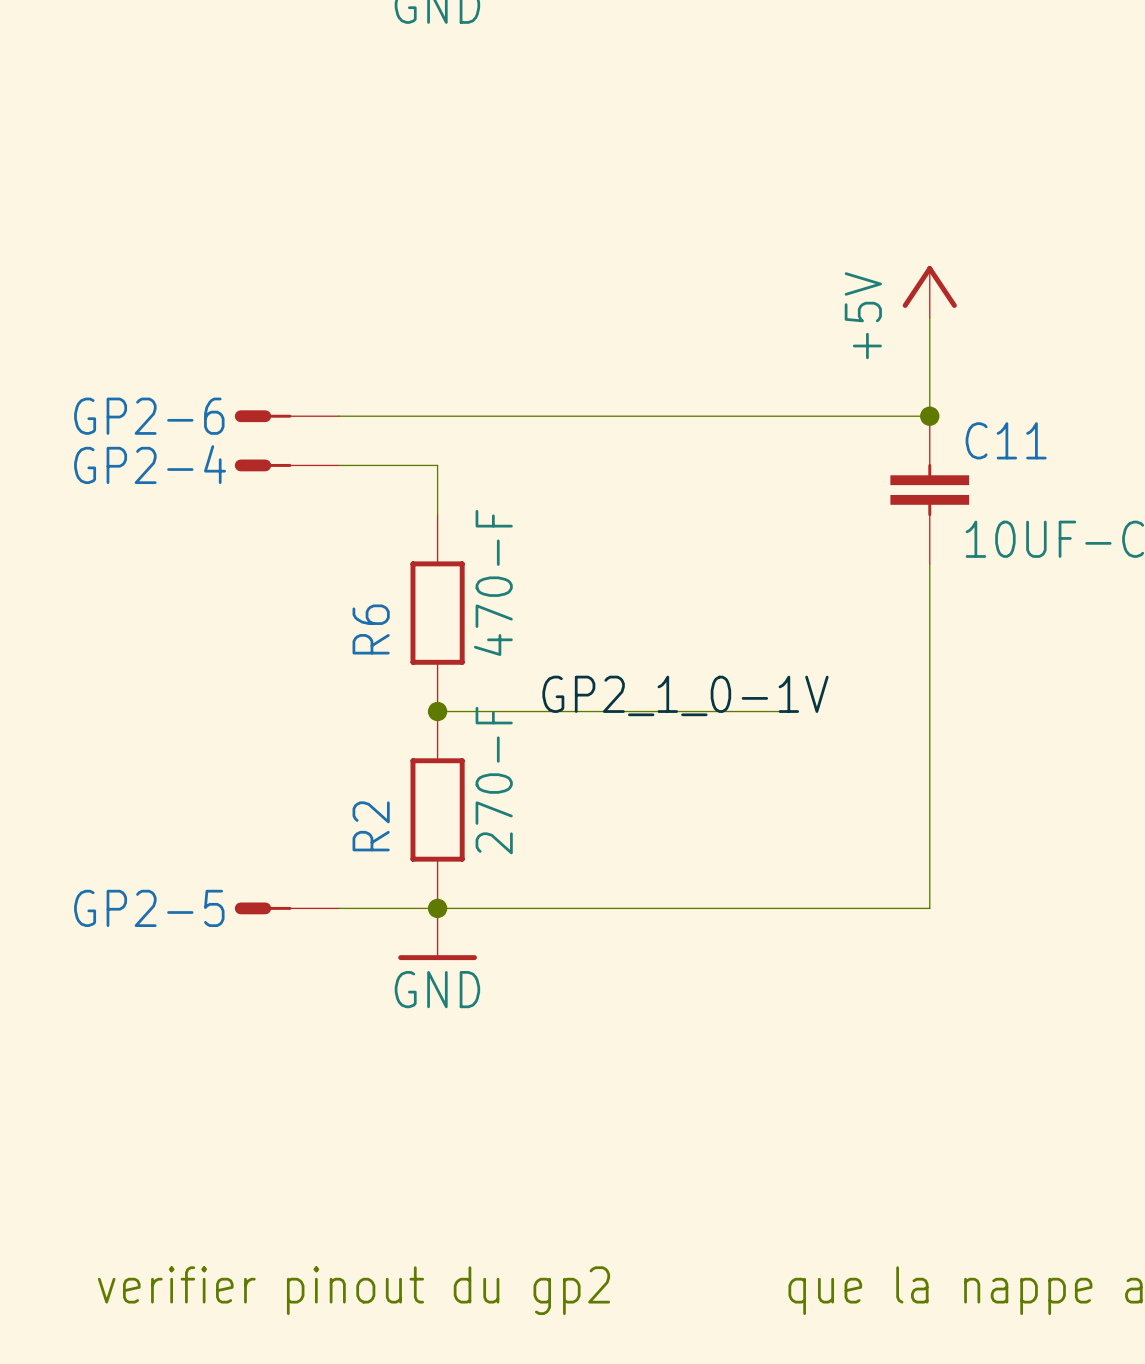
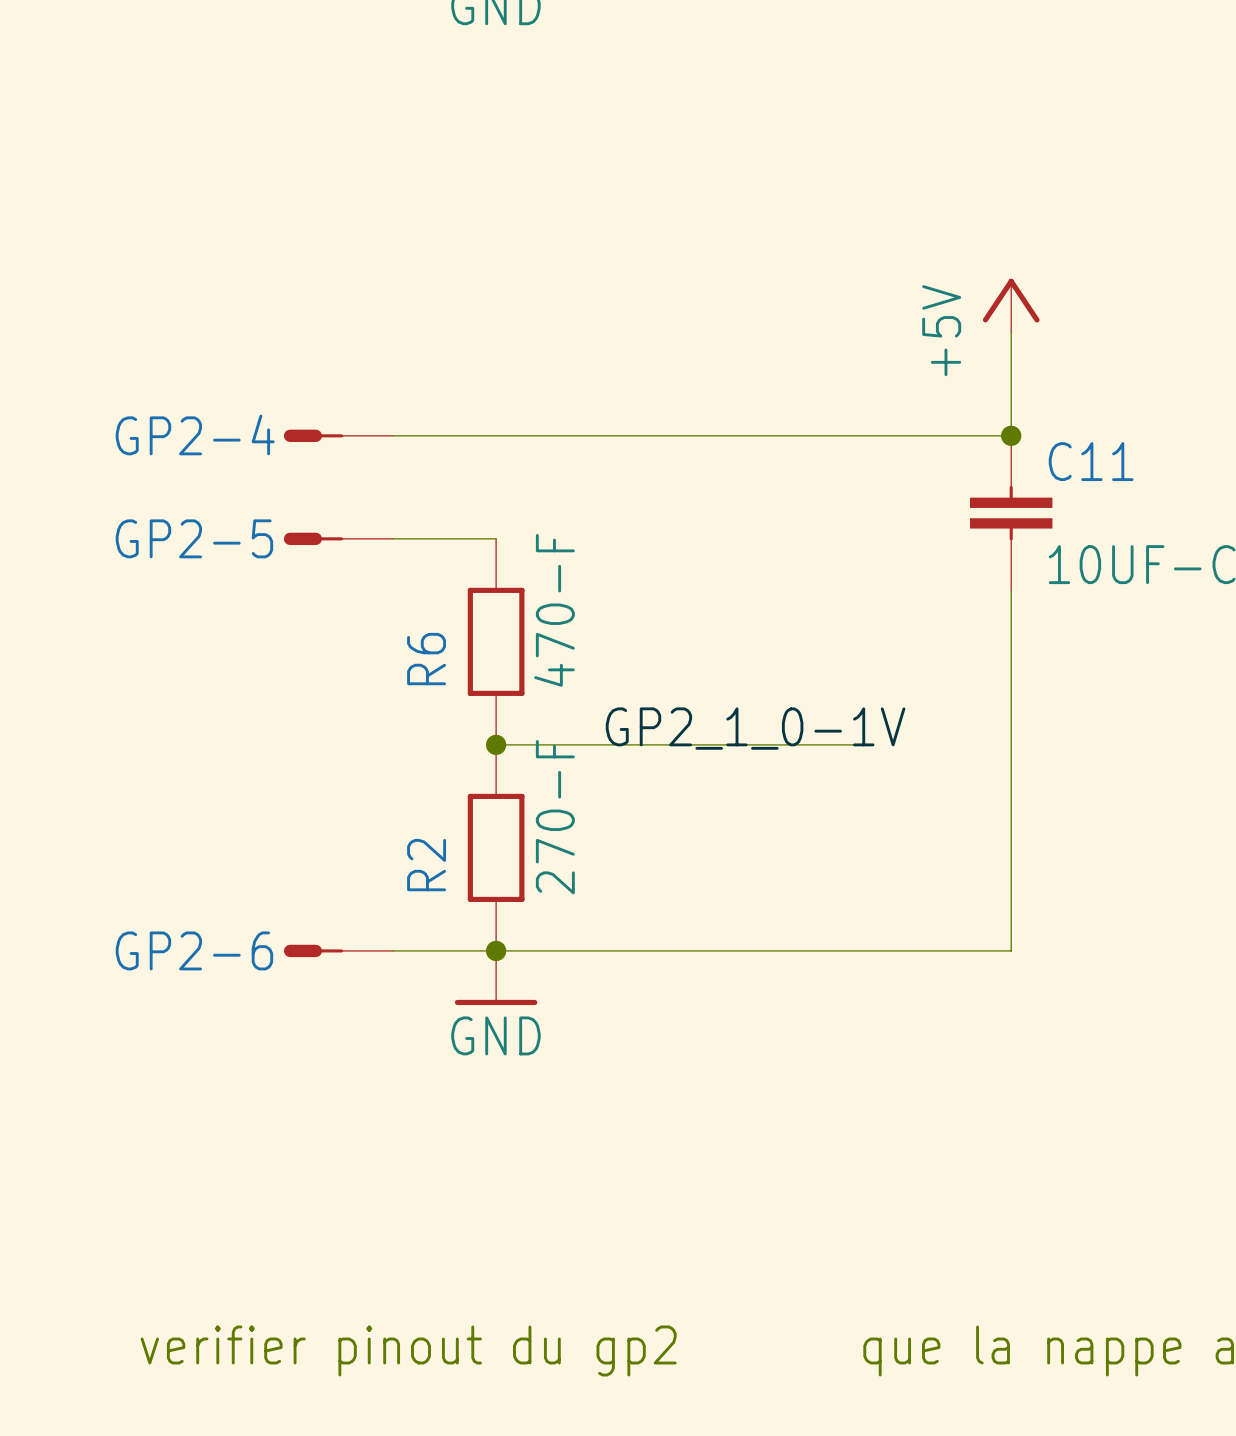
GP2-6 name: GP2-6 (149, 416) -> GP2-4 (195, 434)
GP2-4: (286, 465) -> none
wire: (339, 465) (437, 465) (437, 514) -> (393, 538) (496, 538)
GP2-5: none -> (338, 538)
GP2-5 name: GP2-5 (149, 908) -> GP2-6 (194, 950)

